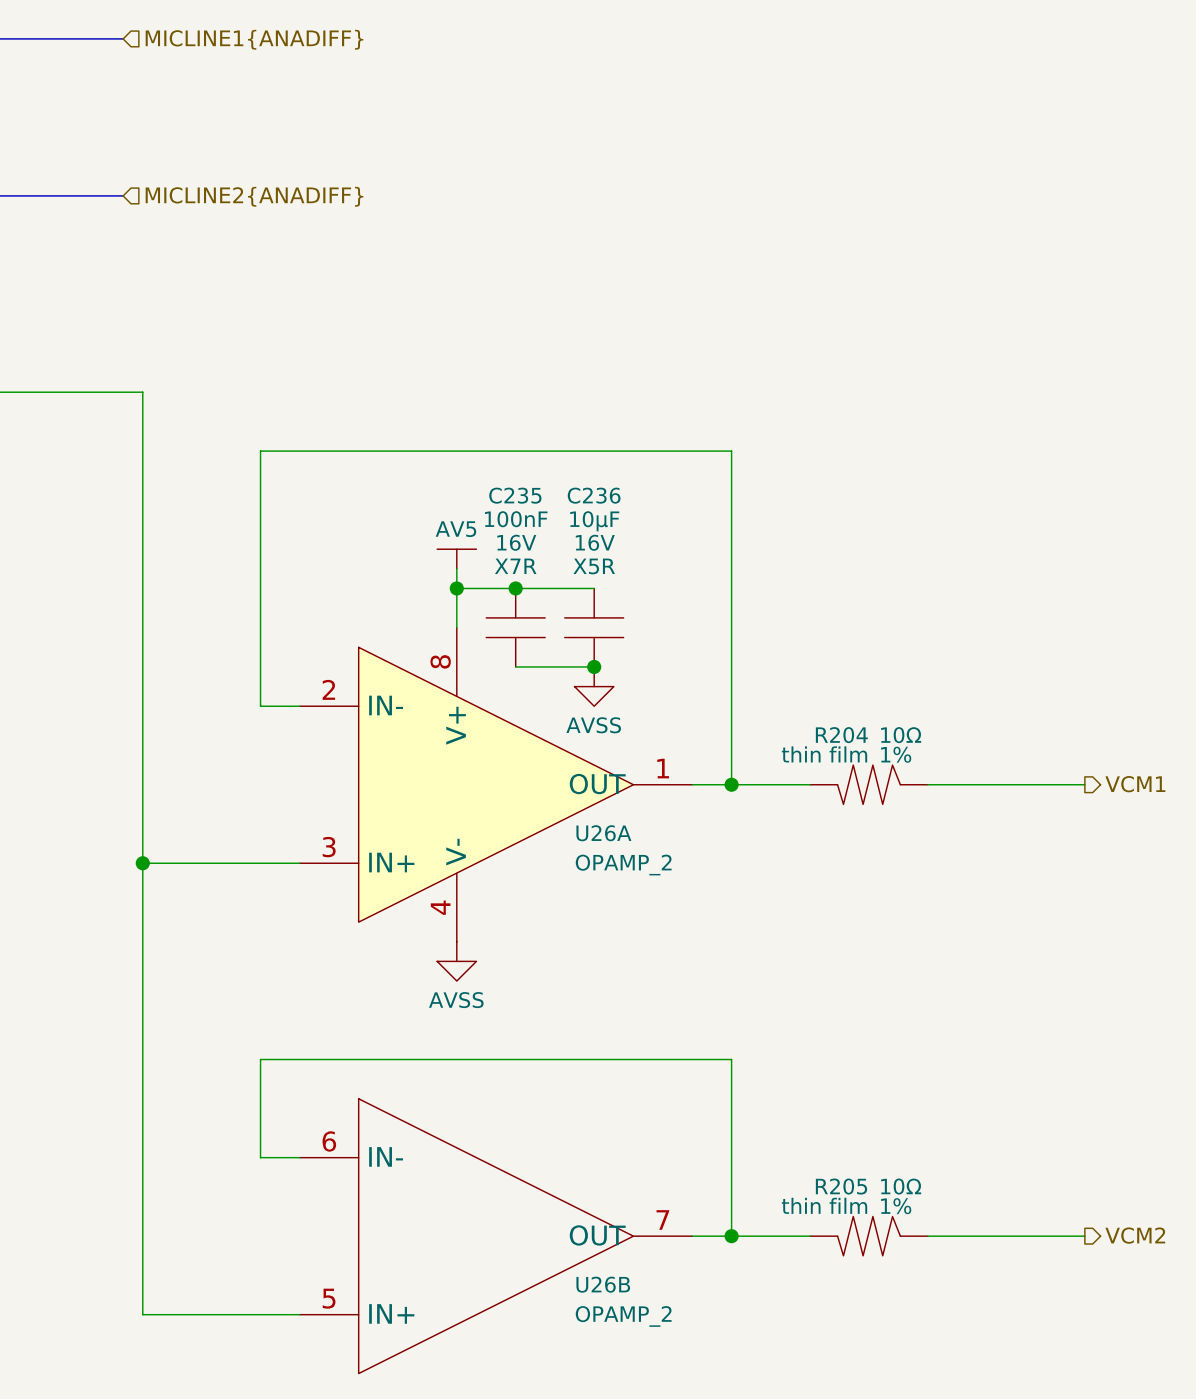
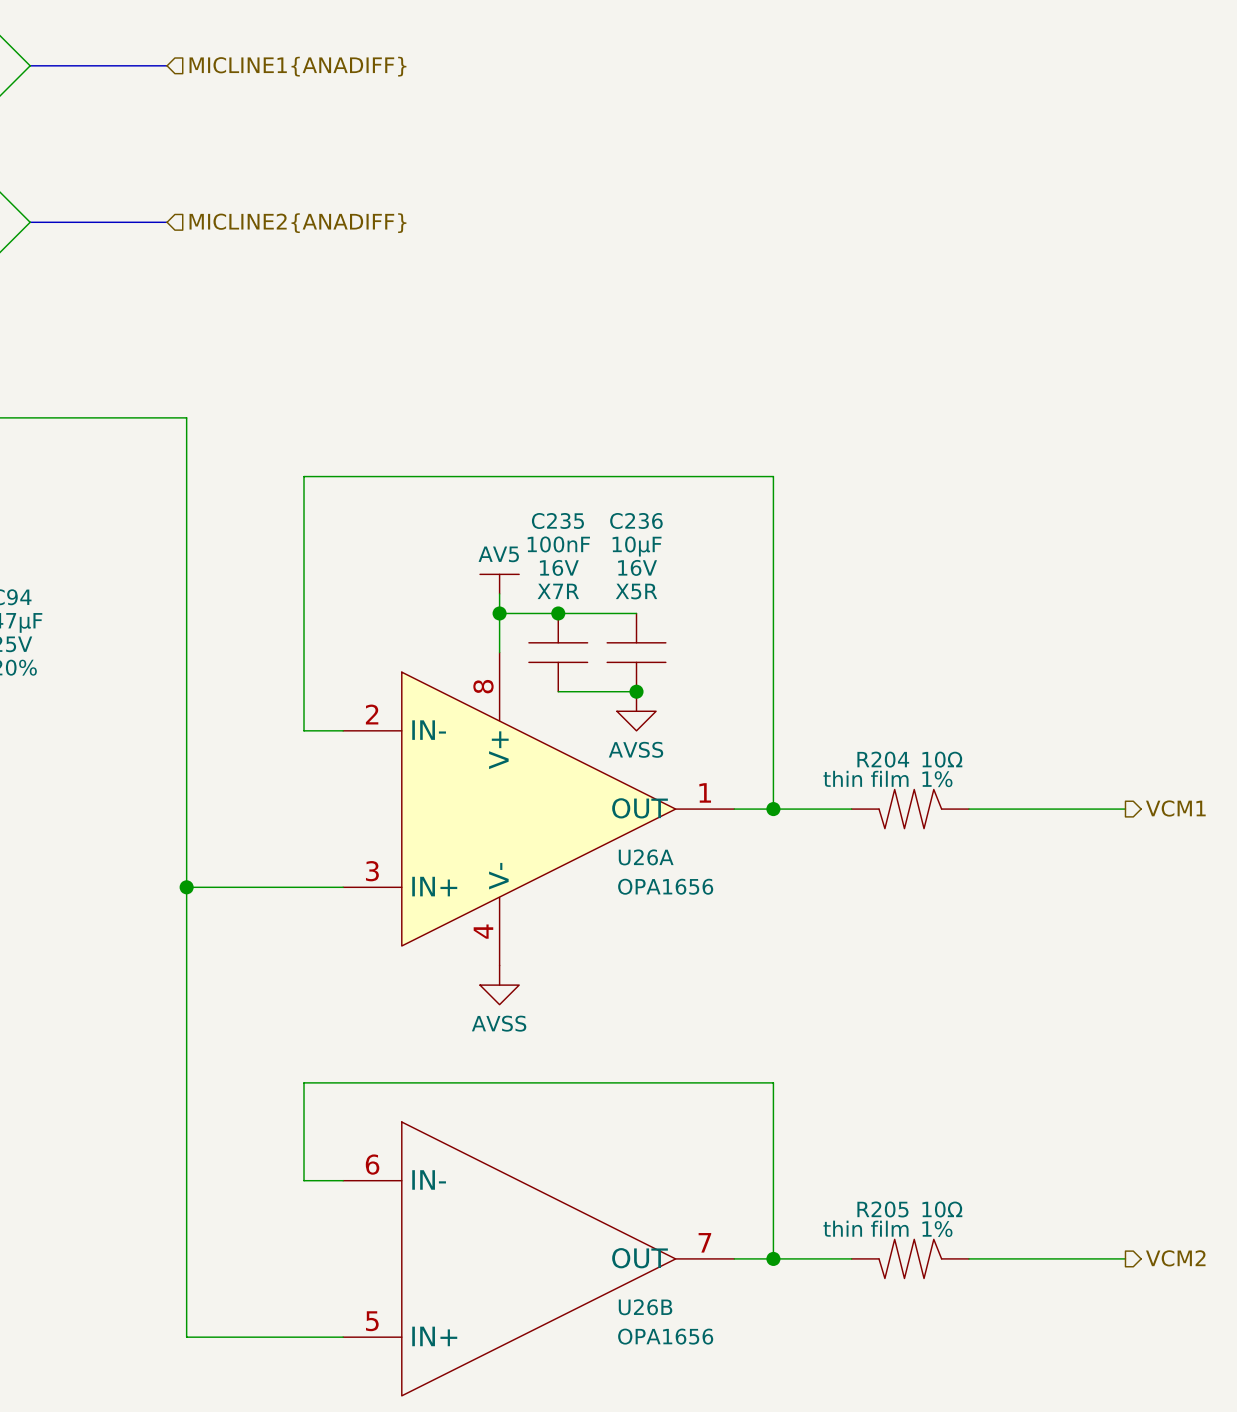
U26A value: OPAMP_2 (623, 865) -> OPA1656 (665, 886)
U26B value: OPAMP_2 (623, 1316) -> OPA1656 (665, 1336)

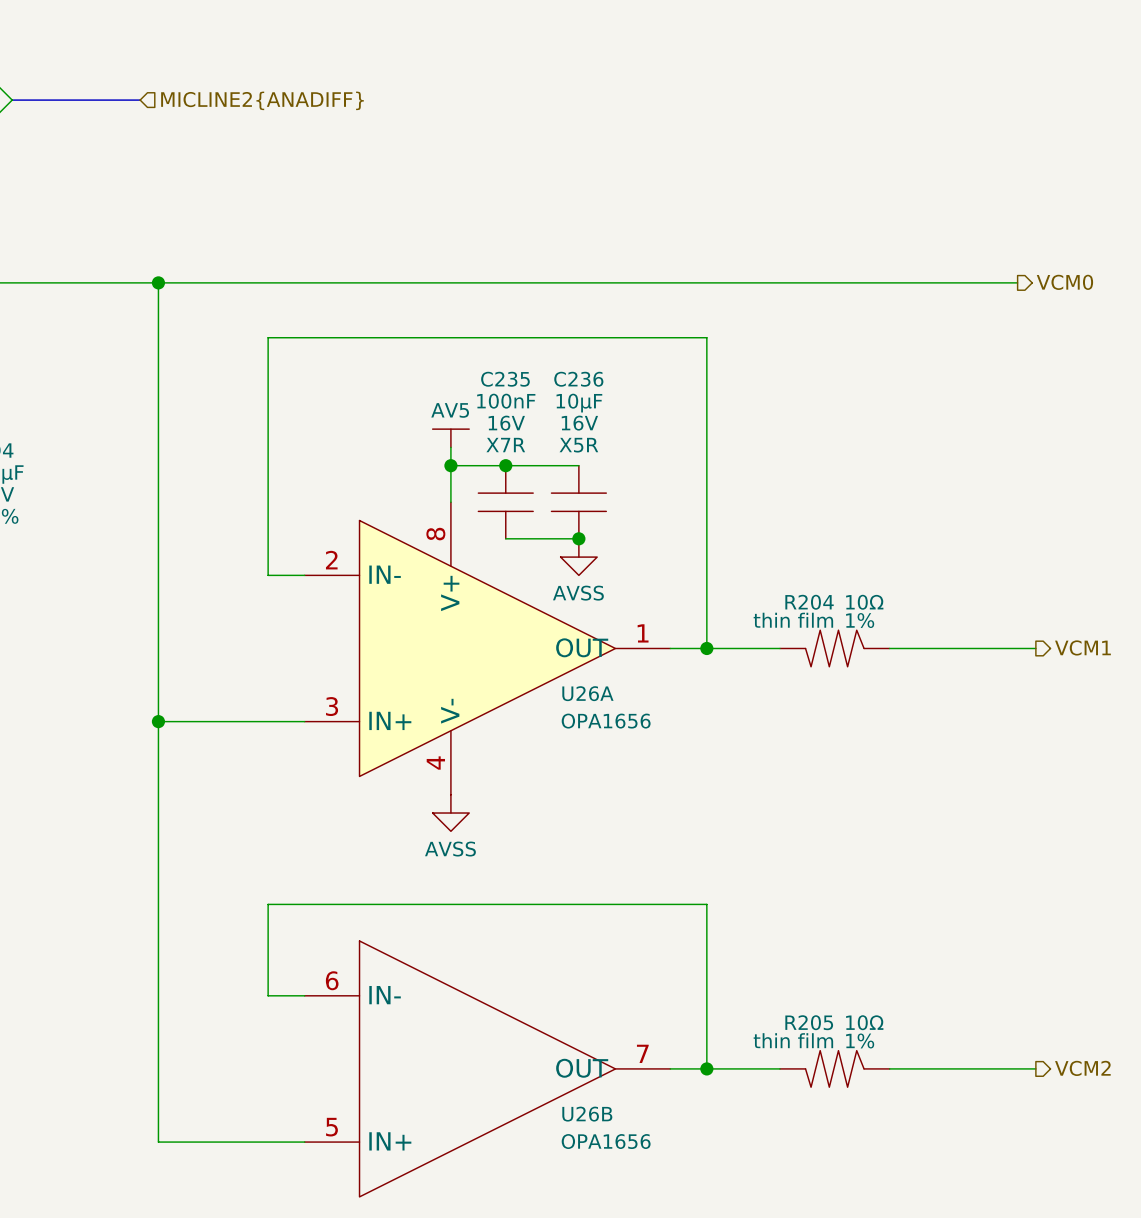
wire: none -> (158, 282) (1017, 282)
junction: none -> (158, 282)
hierarchical label: none -> VCM0 (1064, 282)

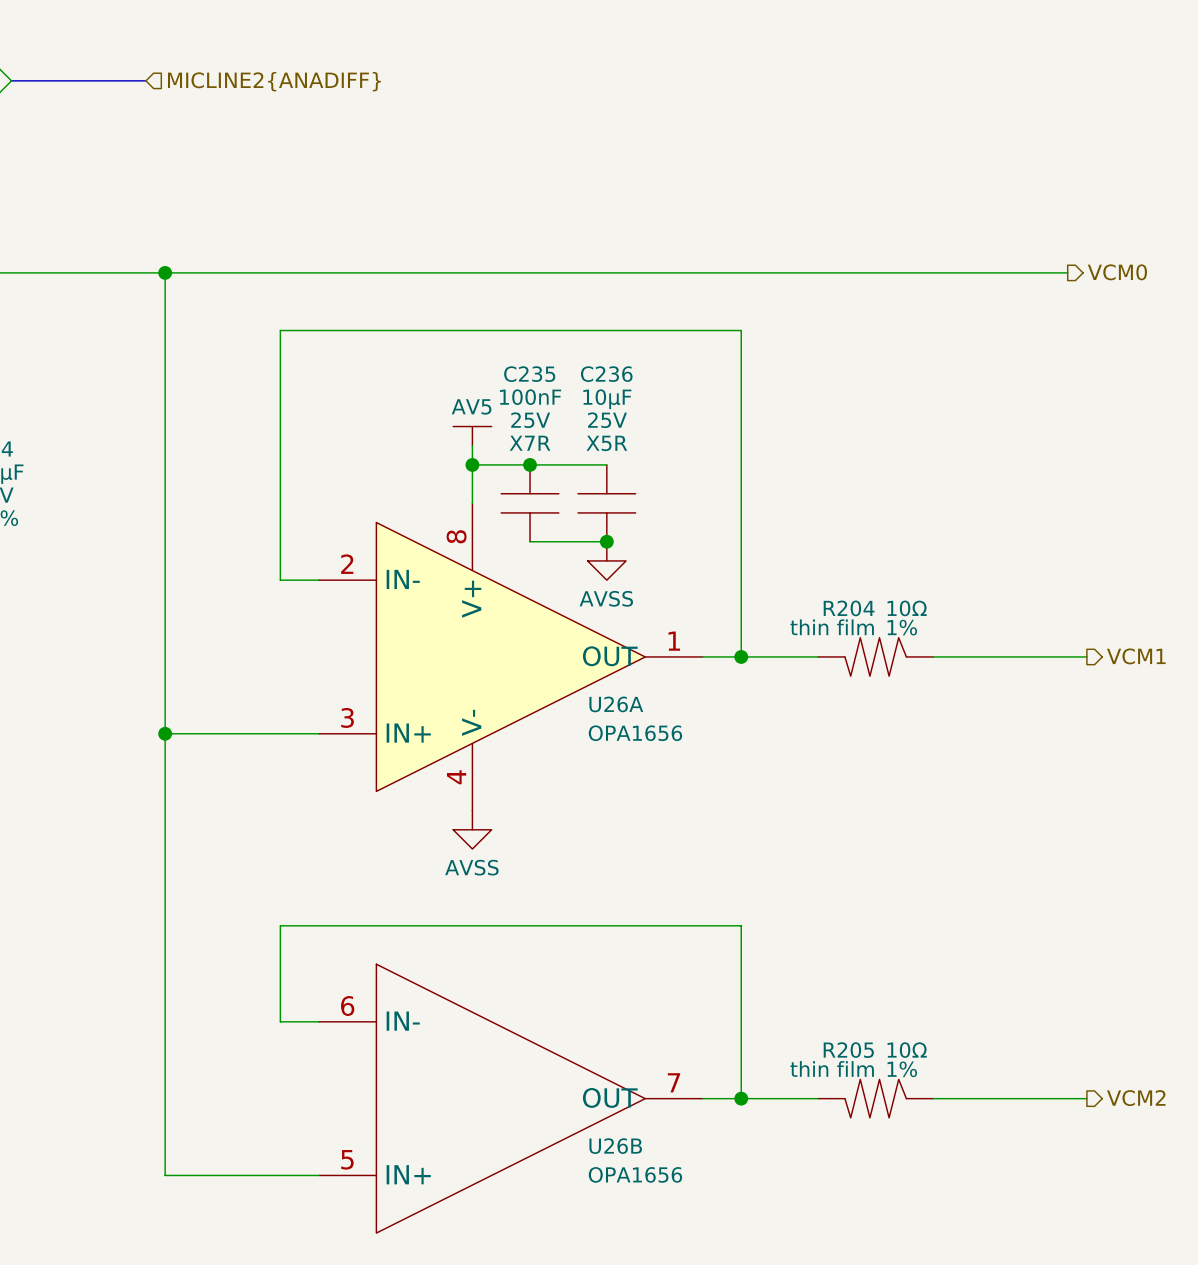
C235 text: 16V (506, 423) -> 25V (530, 420)
C236 text: 16V (579, 423) -> 25V (607, 420)

